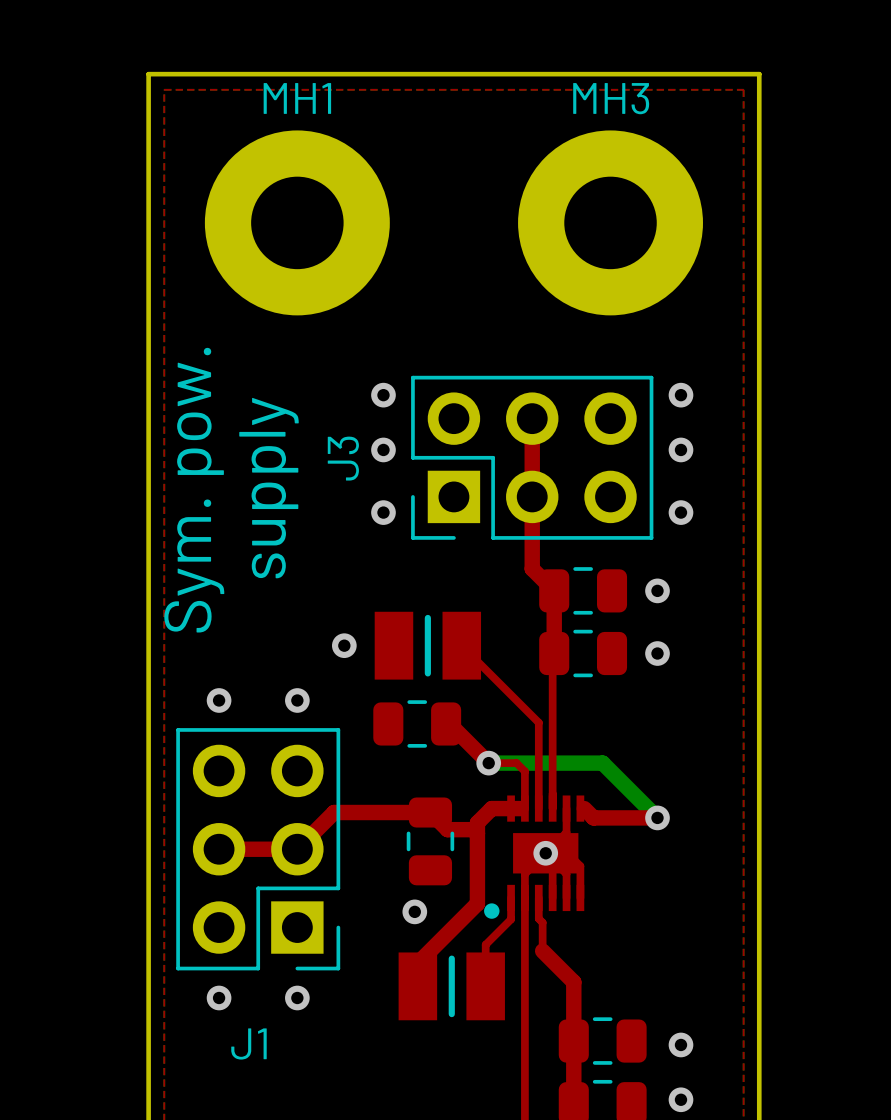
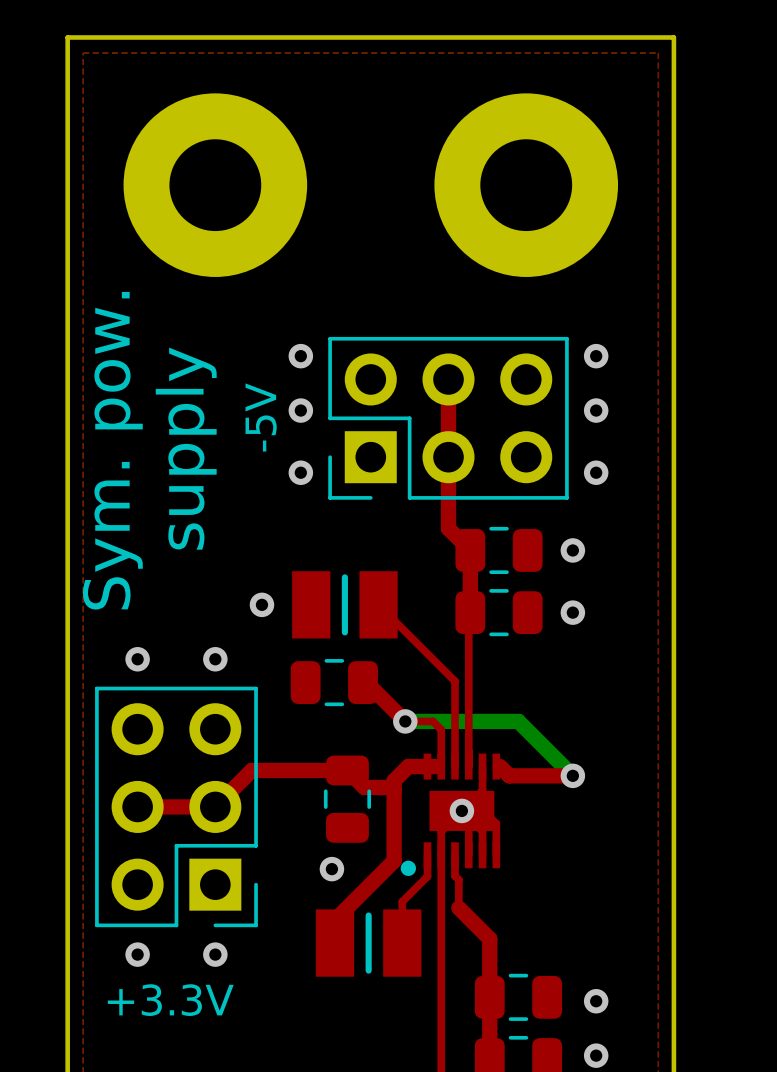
MH1 name: MH1 (297, 98) -> none
MH3 name: MH3 (611, 98) -> none
J3 name: J3 (343, 458) -> -5V (261, 417)
J1 name: J1 (248, 1043) -> +3.3V (170, 1000)

